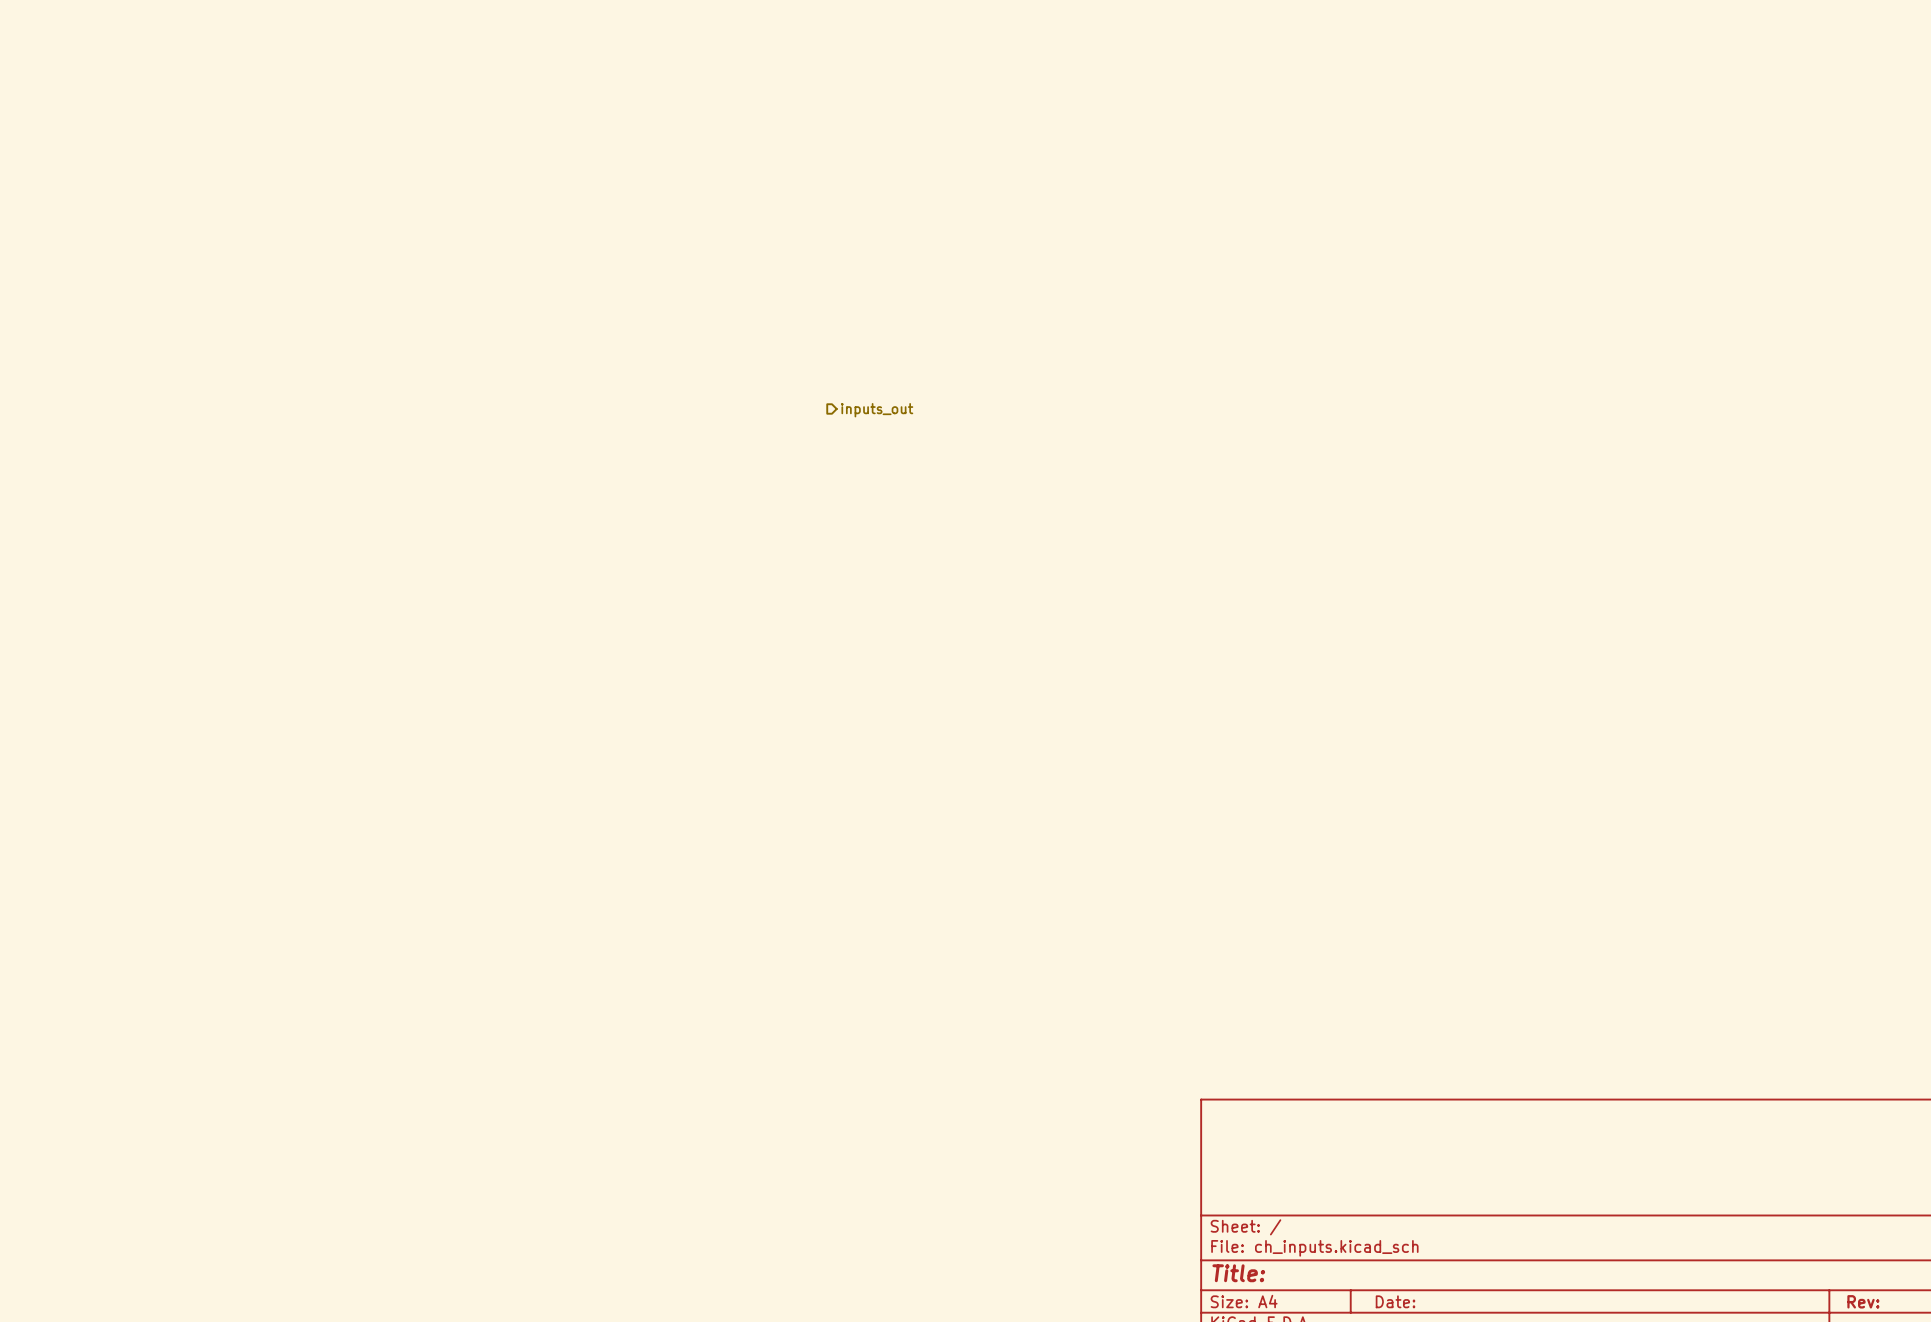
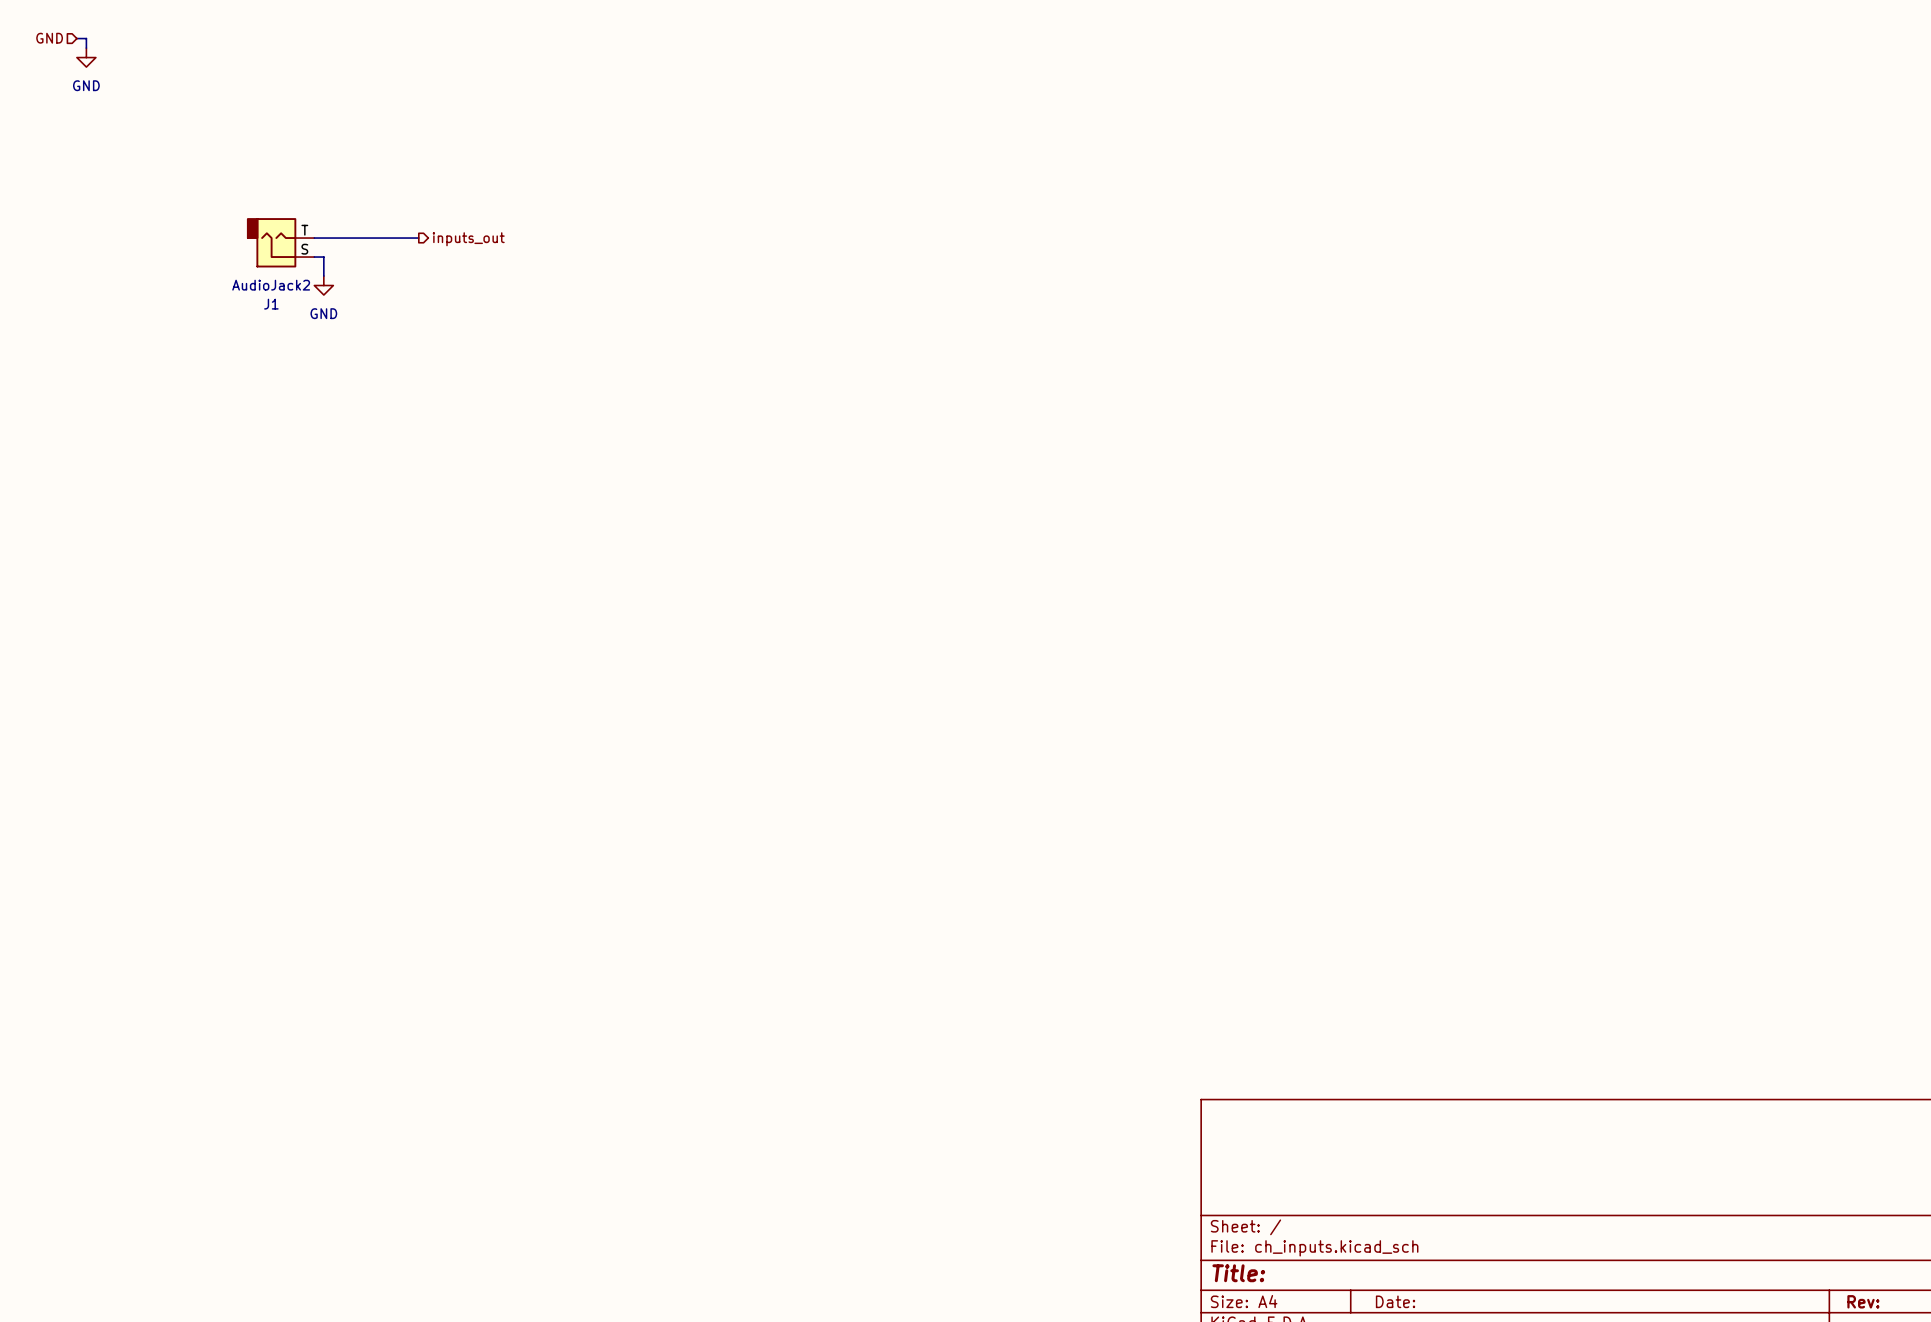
hierarchical label: none -> GND (49, 38)
wire: none -> (76, 38) (86, 38) (86, 48)
power symbol: none -> GND (86, 57)
wire: none -> (314, 238) (418, 238)
hierarchical label: none -> inputs_out (468, 239)
J1: none -> AudioJack2 (280, 242)
wire: none -> (314, 257) (323, 257) (323, 276)
power symbol: none -> GND (323, 285)
hierarchical label: inputs_out (877, 410) -> none

